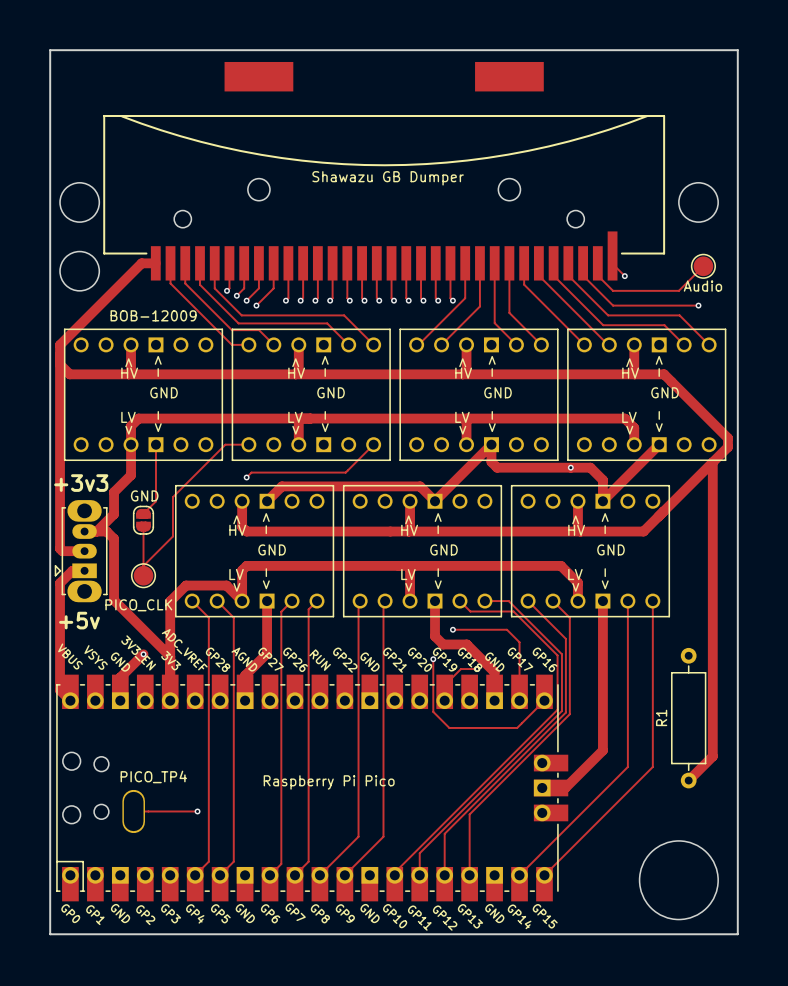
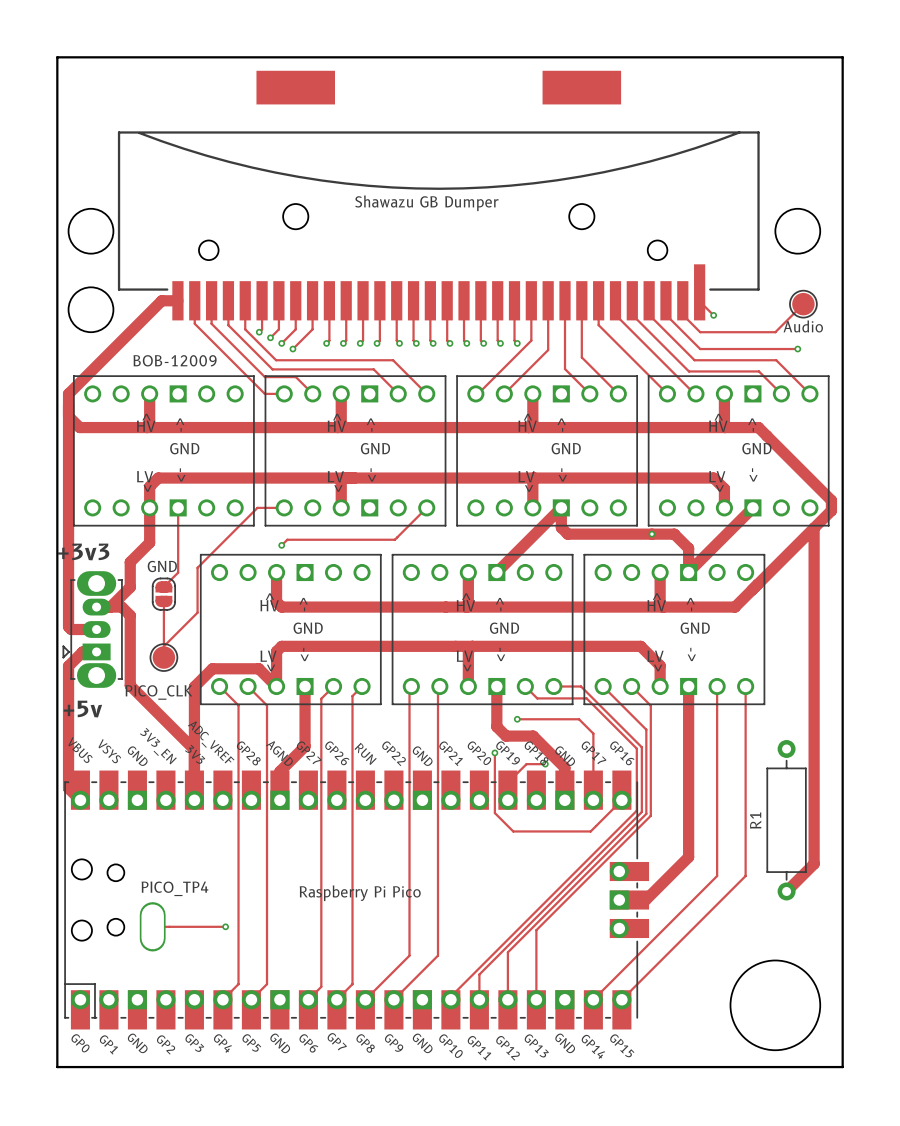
track: (267, 501) (281, 486) (420, 486) (435, 501) -> none
track: (143, 654) (120, 677) (120, 700) -> none
via: (143, 654) -> none

